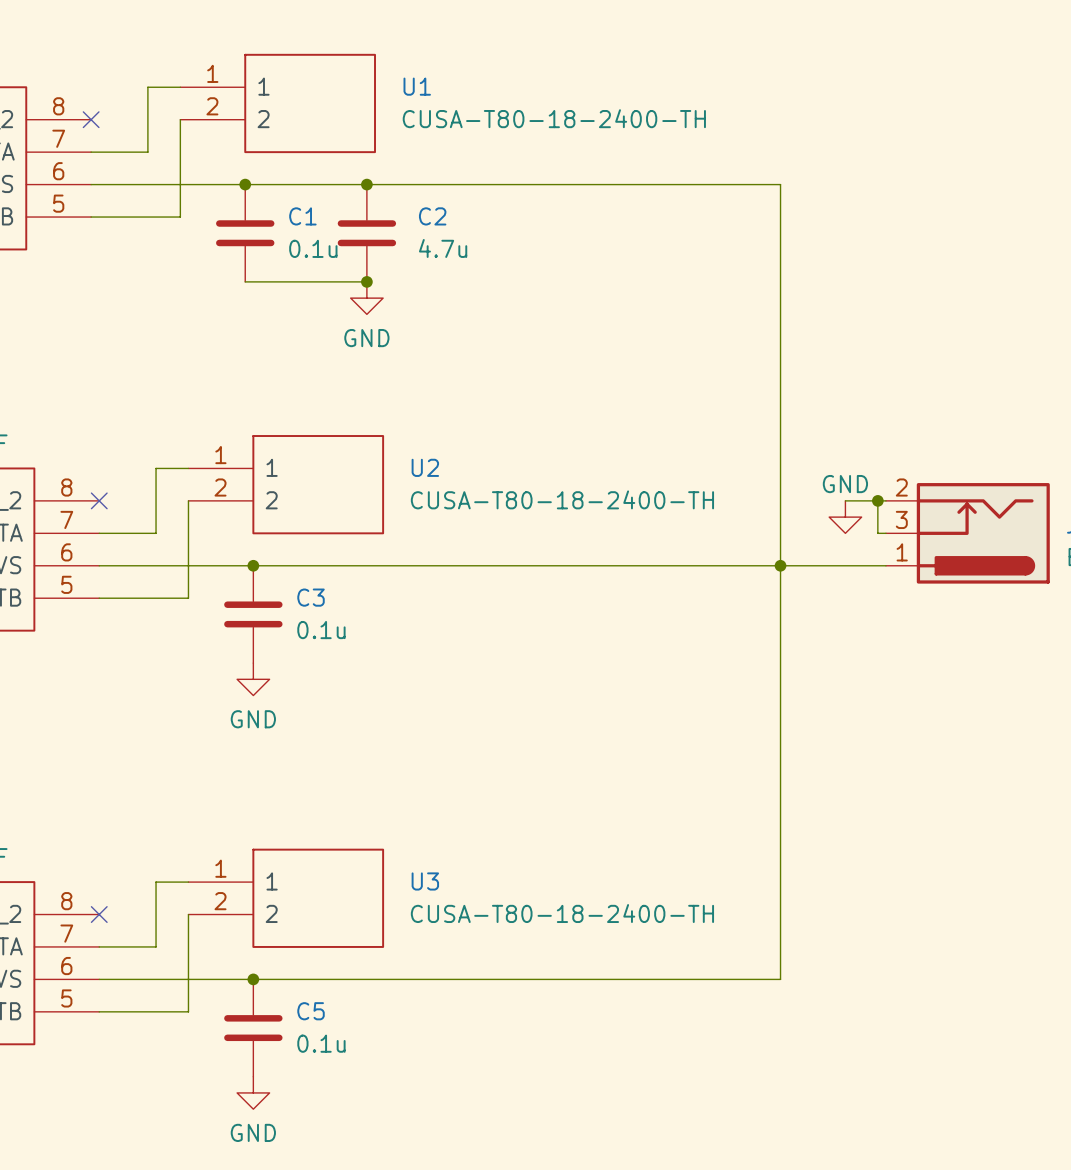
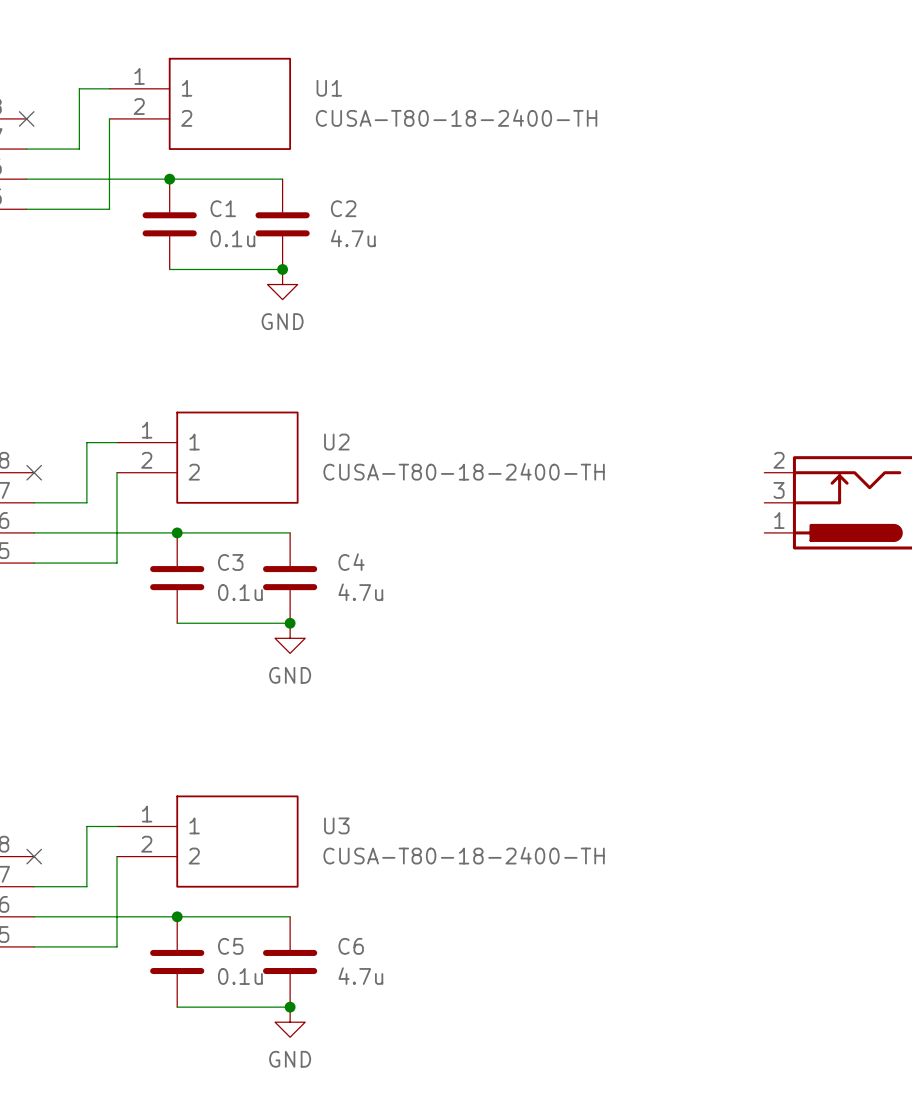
wire: (366, 184) (780, 184) (780, 979) (375, 979) -> none
junction: (366, 184) -> none
wire: (845, 500) (885, 500) -> none
wire: (877, 500) (877, 533) (885, 533) -> none
junction: (877, 500) -> none
power symbol: GND (845, 517) -> none
wire: (375, 565) (885, 565) -> none
junction: (780, 565) -> none
C4: none -> 4.7u (290, 578)
wire: none -> (177, 623) (290, 623)
junction: none -> (290, 623)
power symbol position: GND (253, 679) -> GND (290, 638)
C6: none -> 4.7u (290, 961)
wire: none -> (177, 1007) (290, 1007)
junction: none -> (290, 1007)
power symbol position: GND (253, 1092) -> GND (290, 1022)

